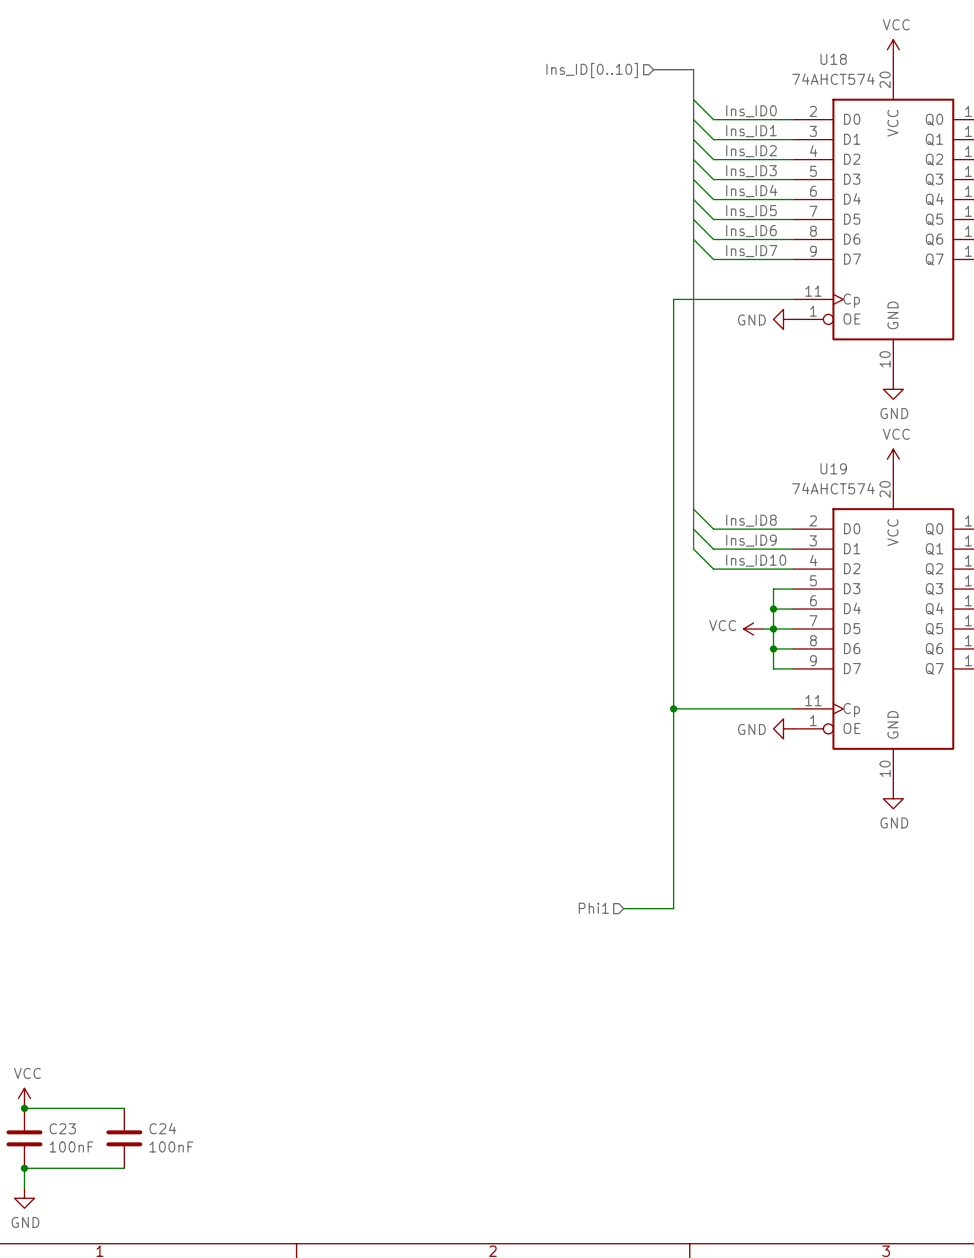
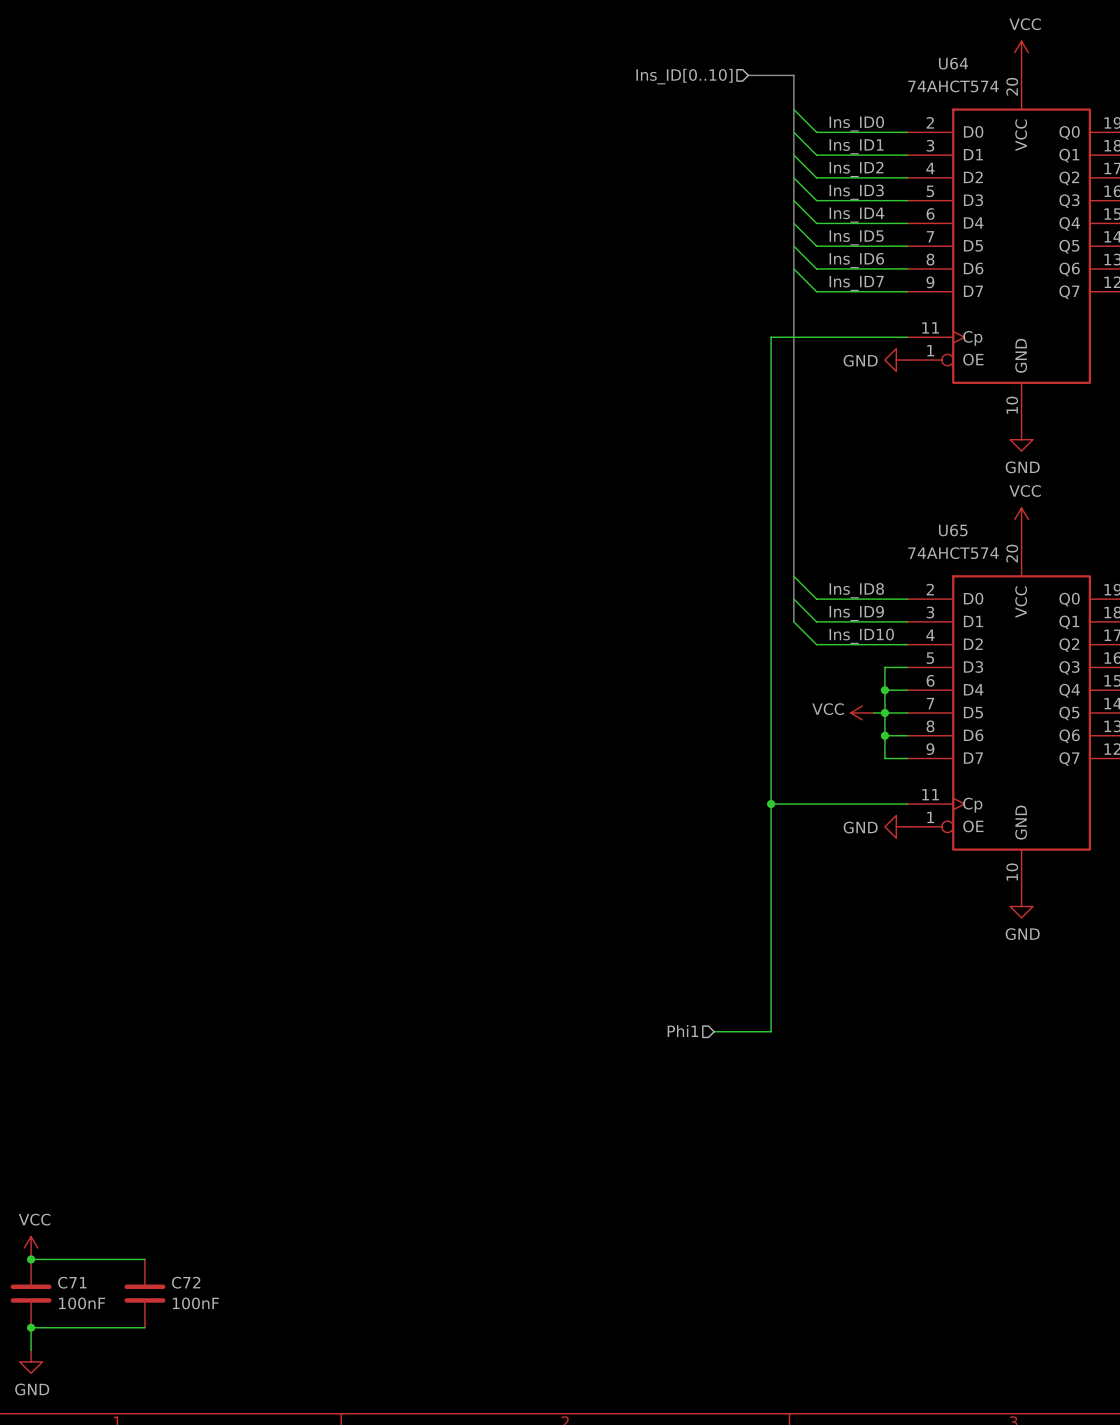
U18 name: U18 (833, 59) -> U64 (953, 63)
U19 name: U19 (833, 468) -> U65 (953, 530)
C23 name: C23 (62, 1128) -> C71 (72, 1282)
C24 name: C24 (162, 1128) -> C72 (186, 1282)

